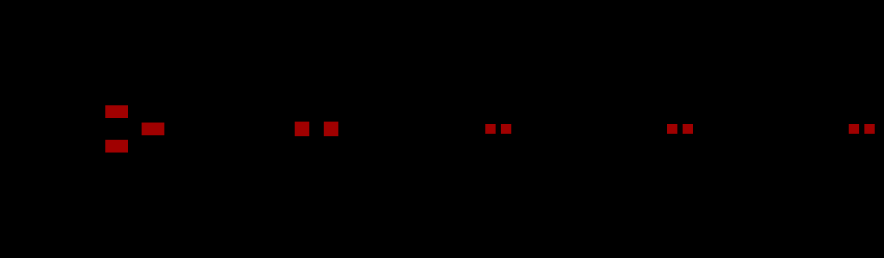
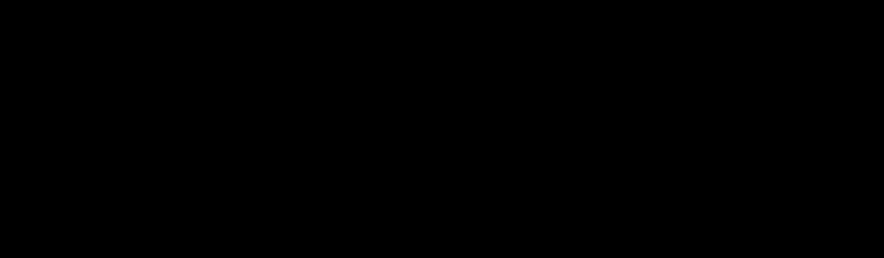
part: (134, 128) -> none
part: (316, 128) -> none
part: (498, 128) -> none
part: (679, 128) -> none
part: (861, 128) -> none

